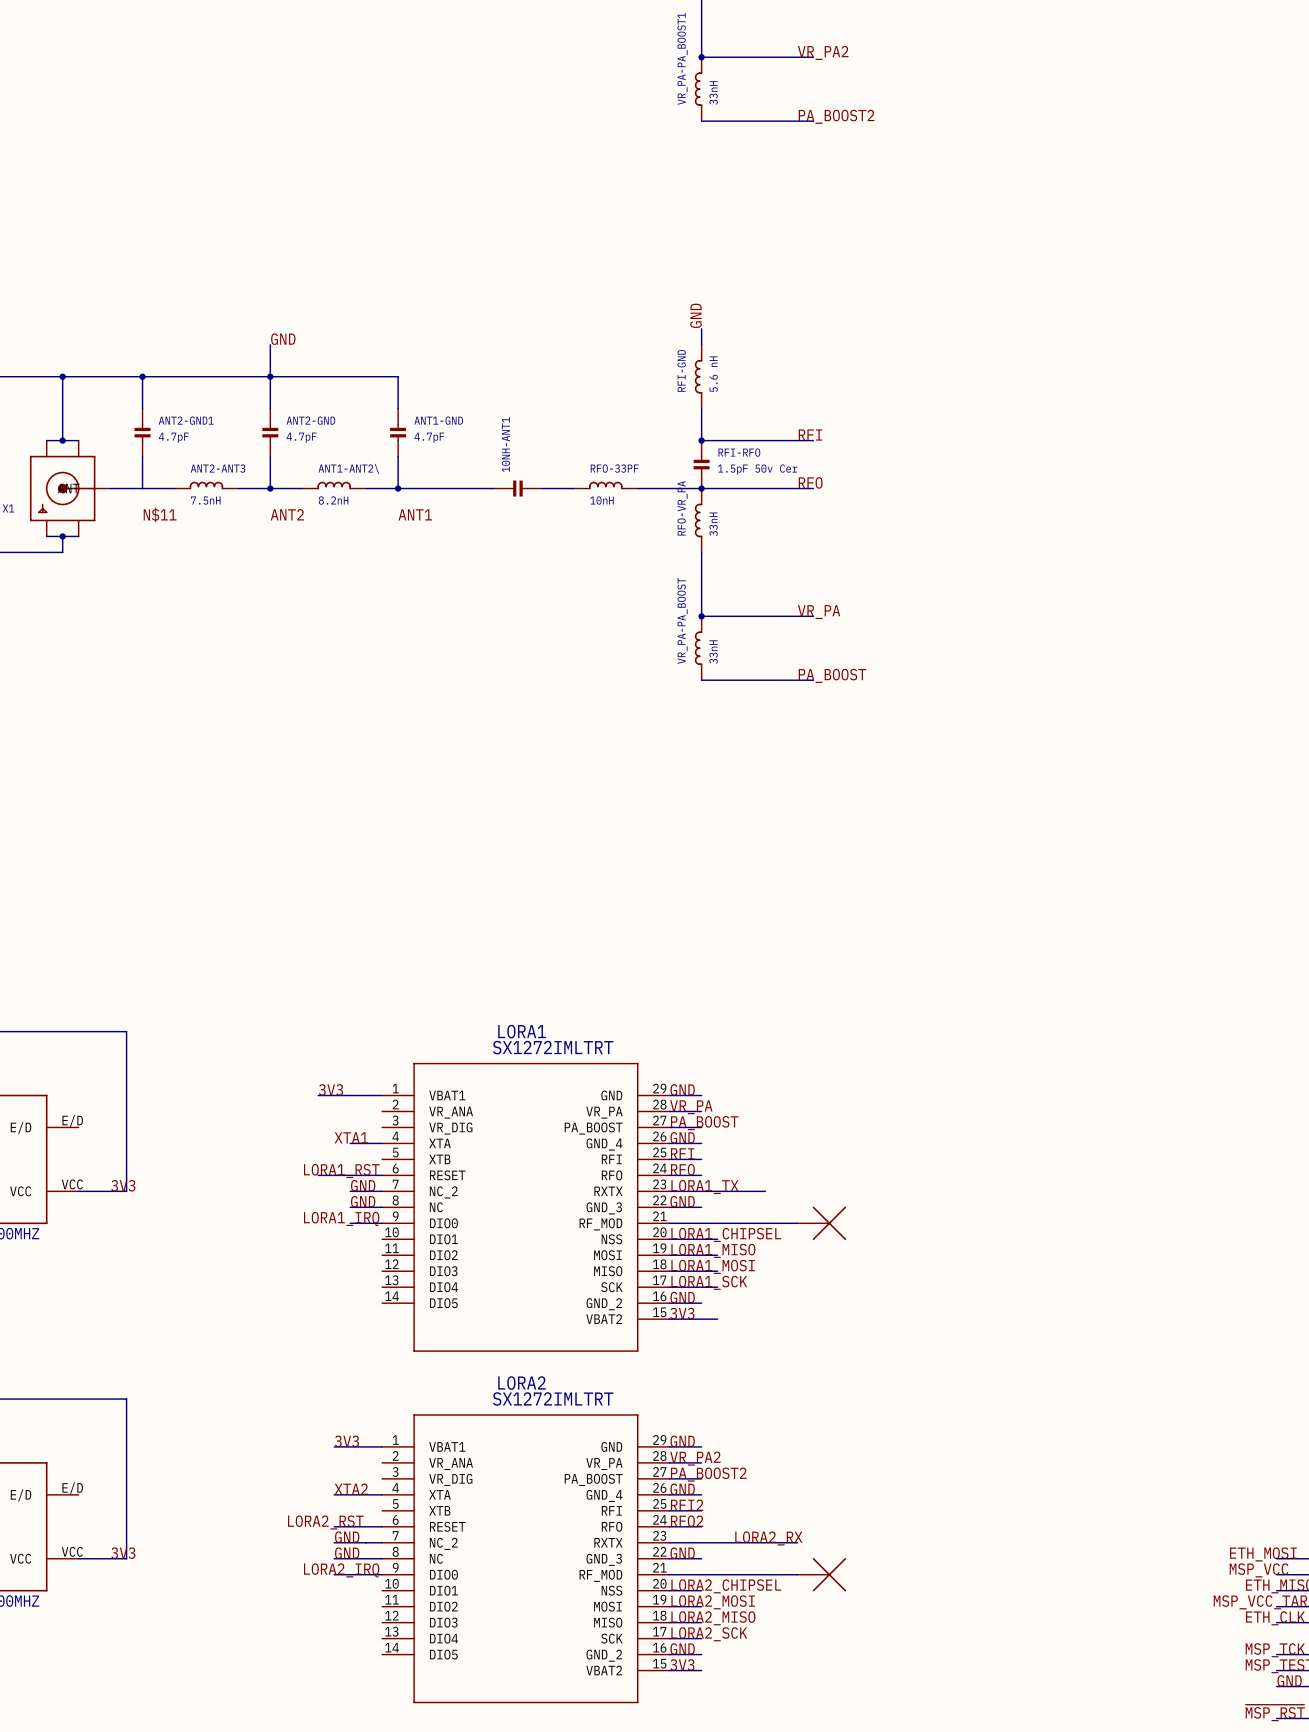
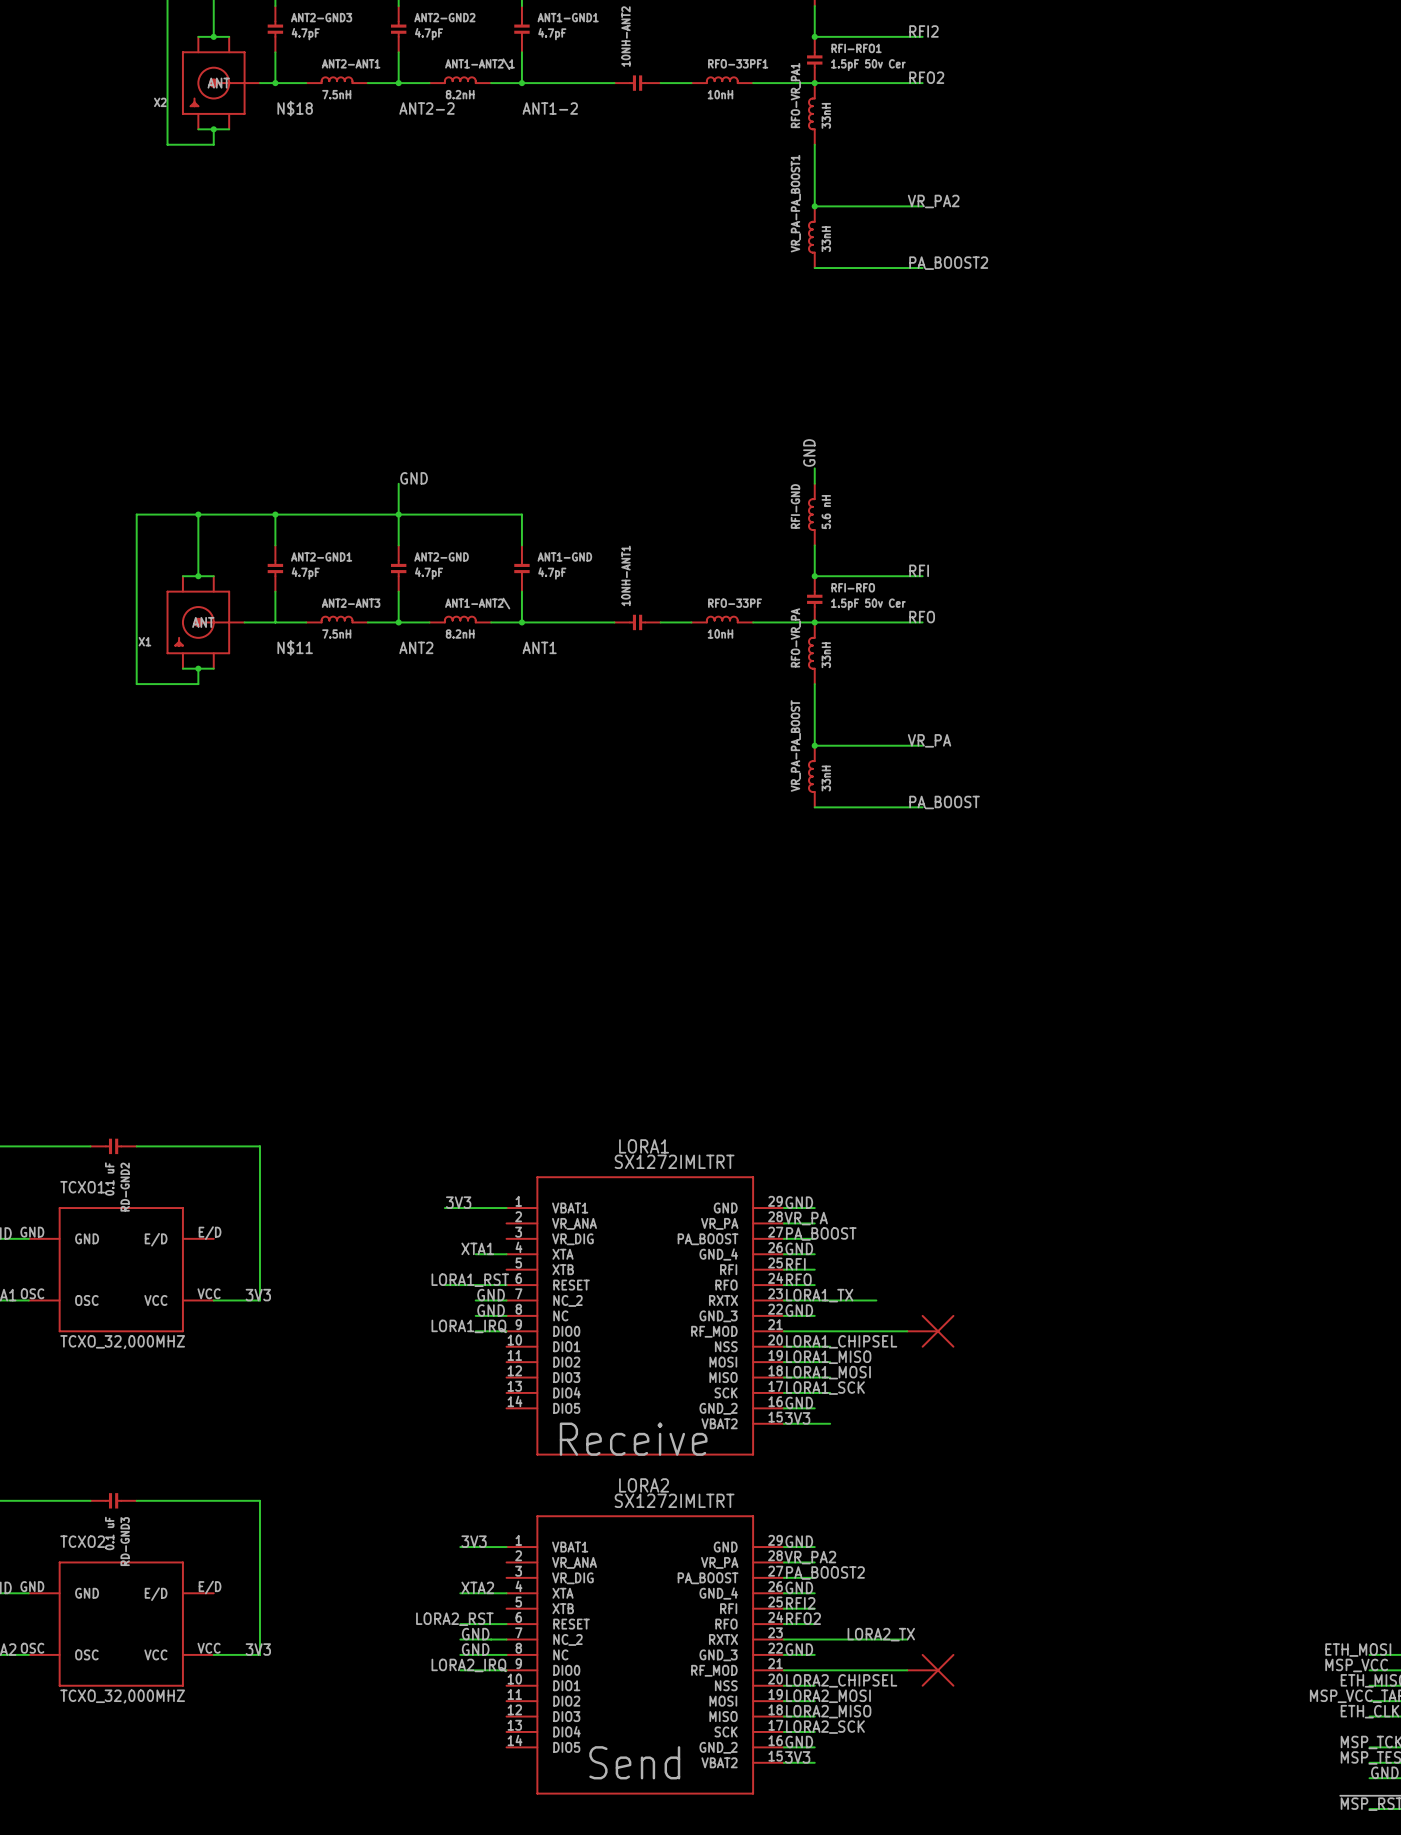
text: none -> Receive (633, 1439)
label: LORA2_RX (768, 1538) -> LORA2_TX (881, 1634)
text: none -> Send (634, 1762)

